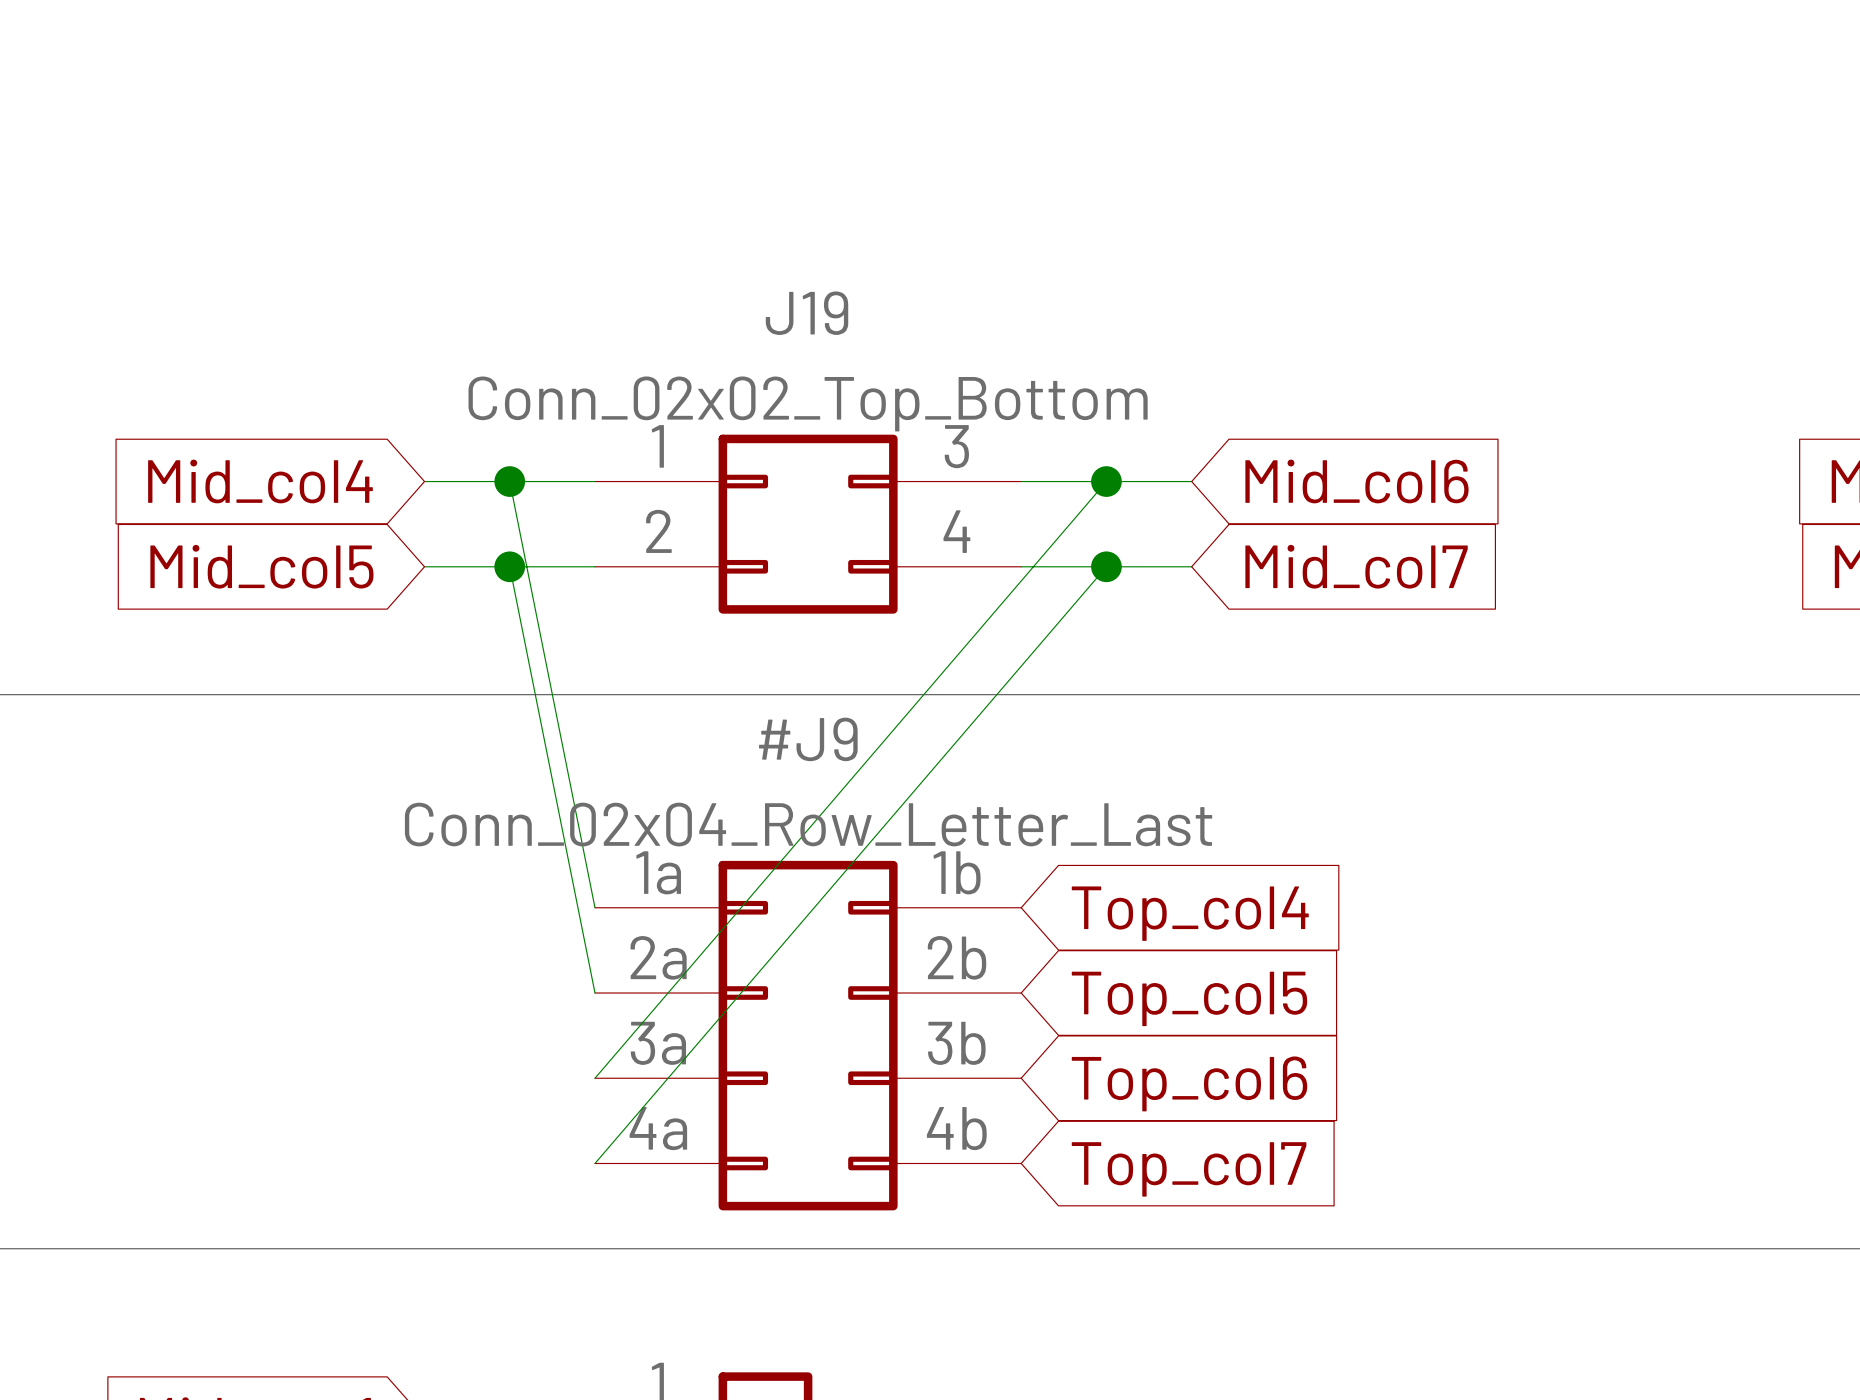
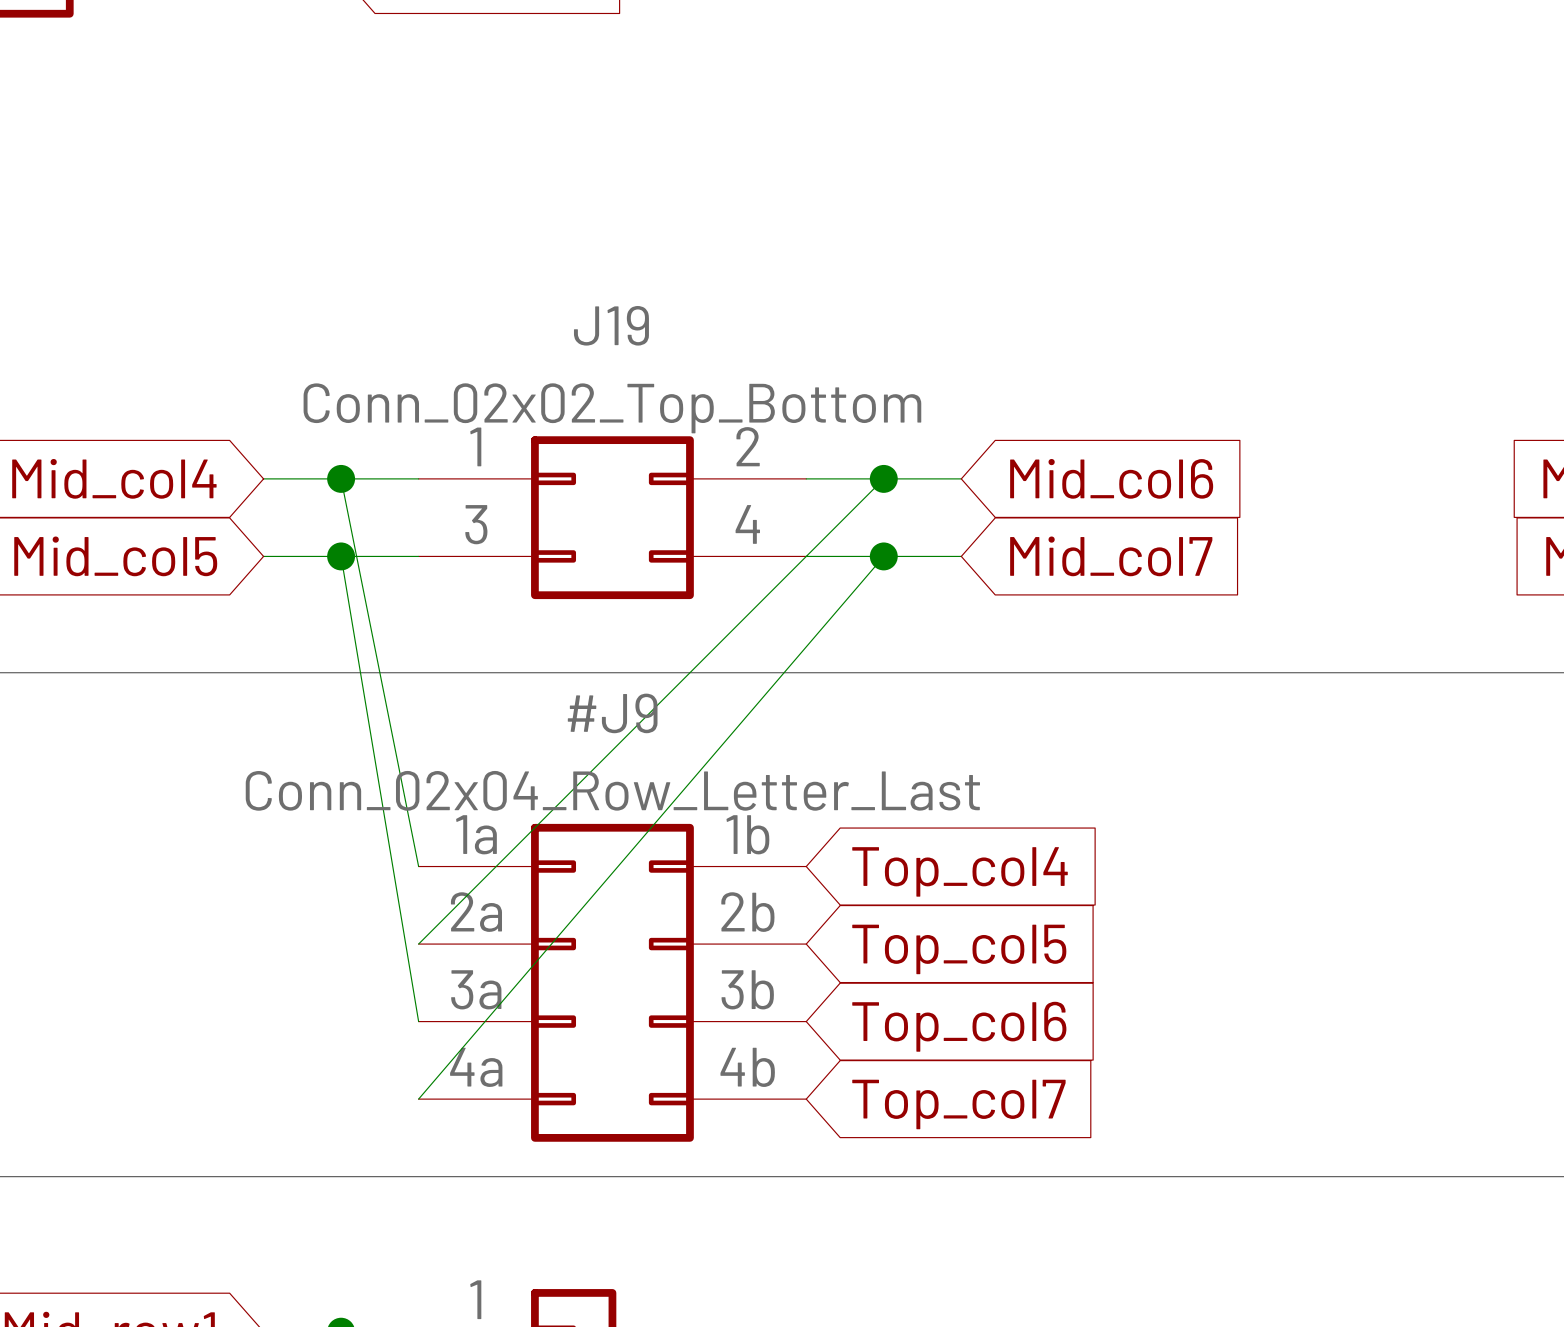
J19 pin number: 3 (956, 446) -> 2 (748, 446)
wire: (1106, 481) (595, 1078) -> (883, 478) (418, 944)
J19 pin number: 2 (658, 531) -> 3 (476, 524)
wire: (509, 566) (595, 993) -> (341, 556) (418, 1021)

